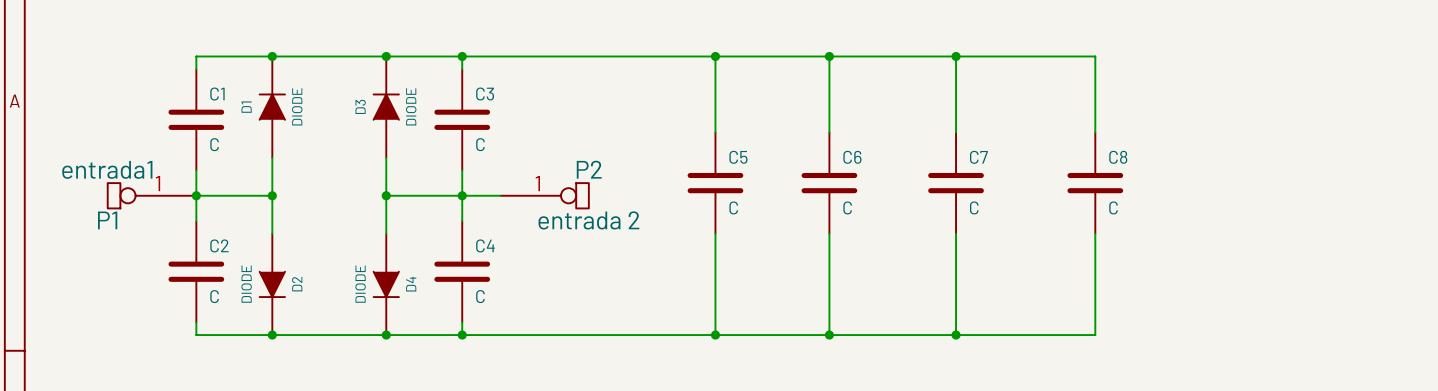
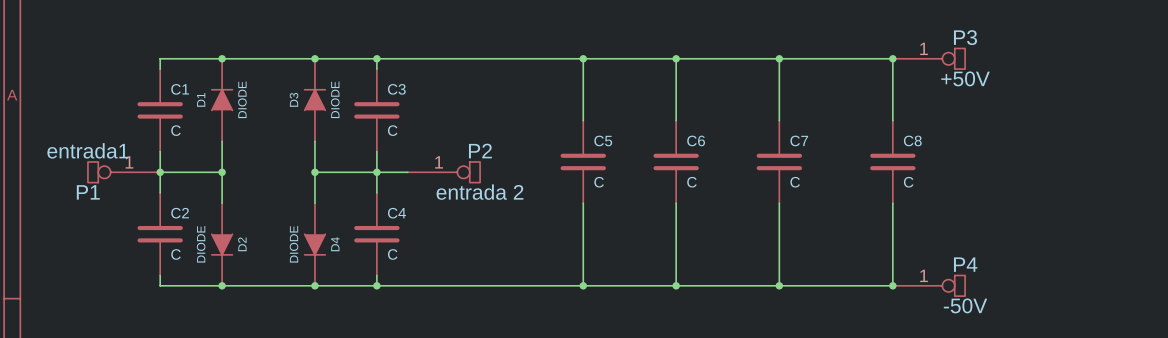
junction: none -> (892, 58)
P3: none -> +50V (928, 58)
junction: none -> (892, 285)
P4: none -> -50V (928, 285)

